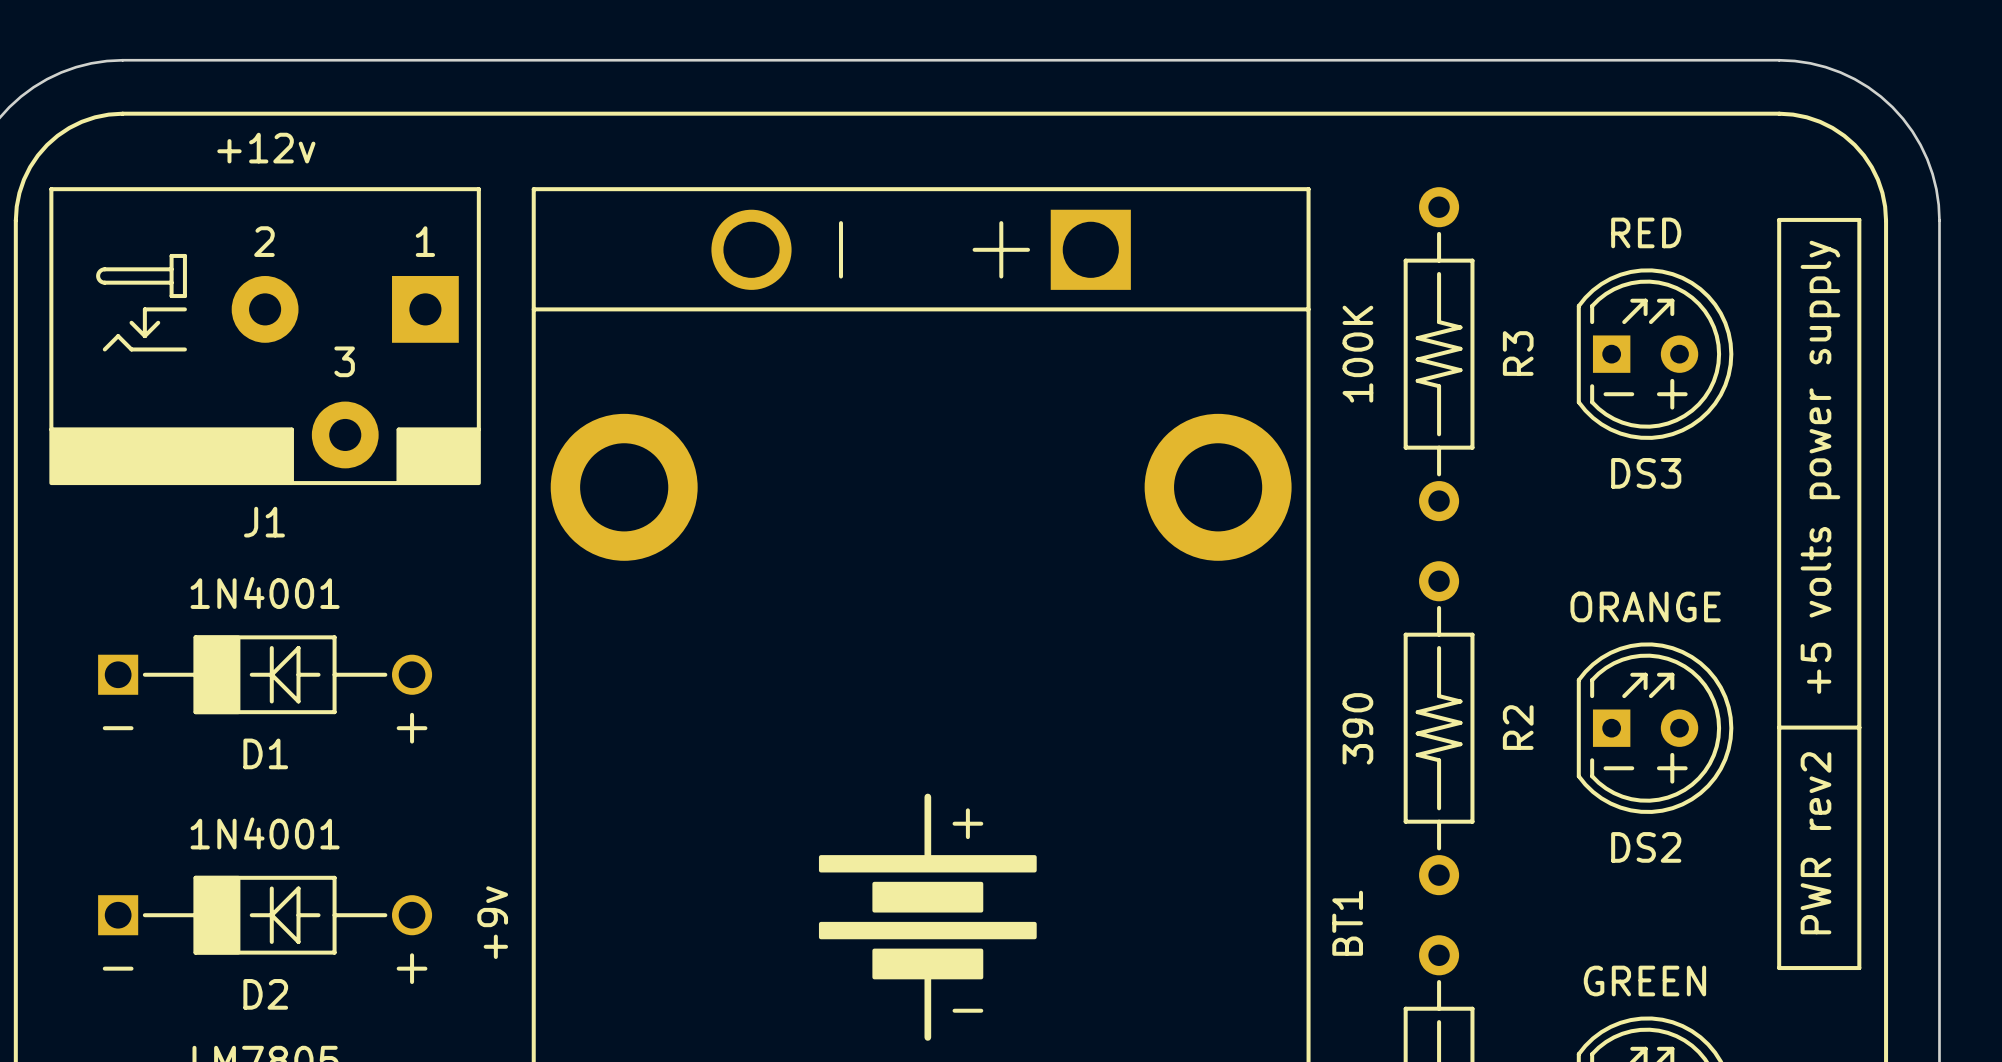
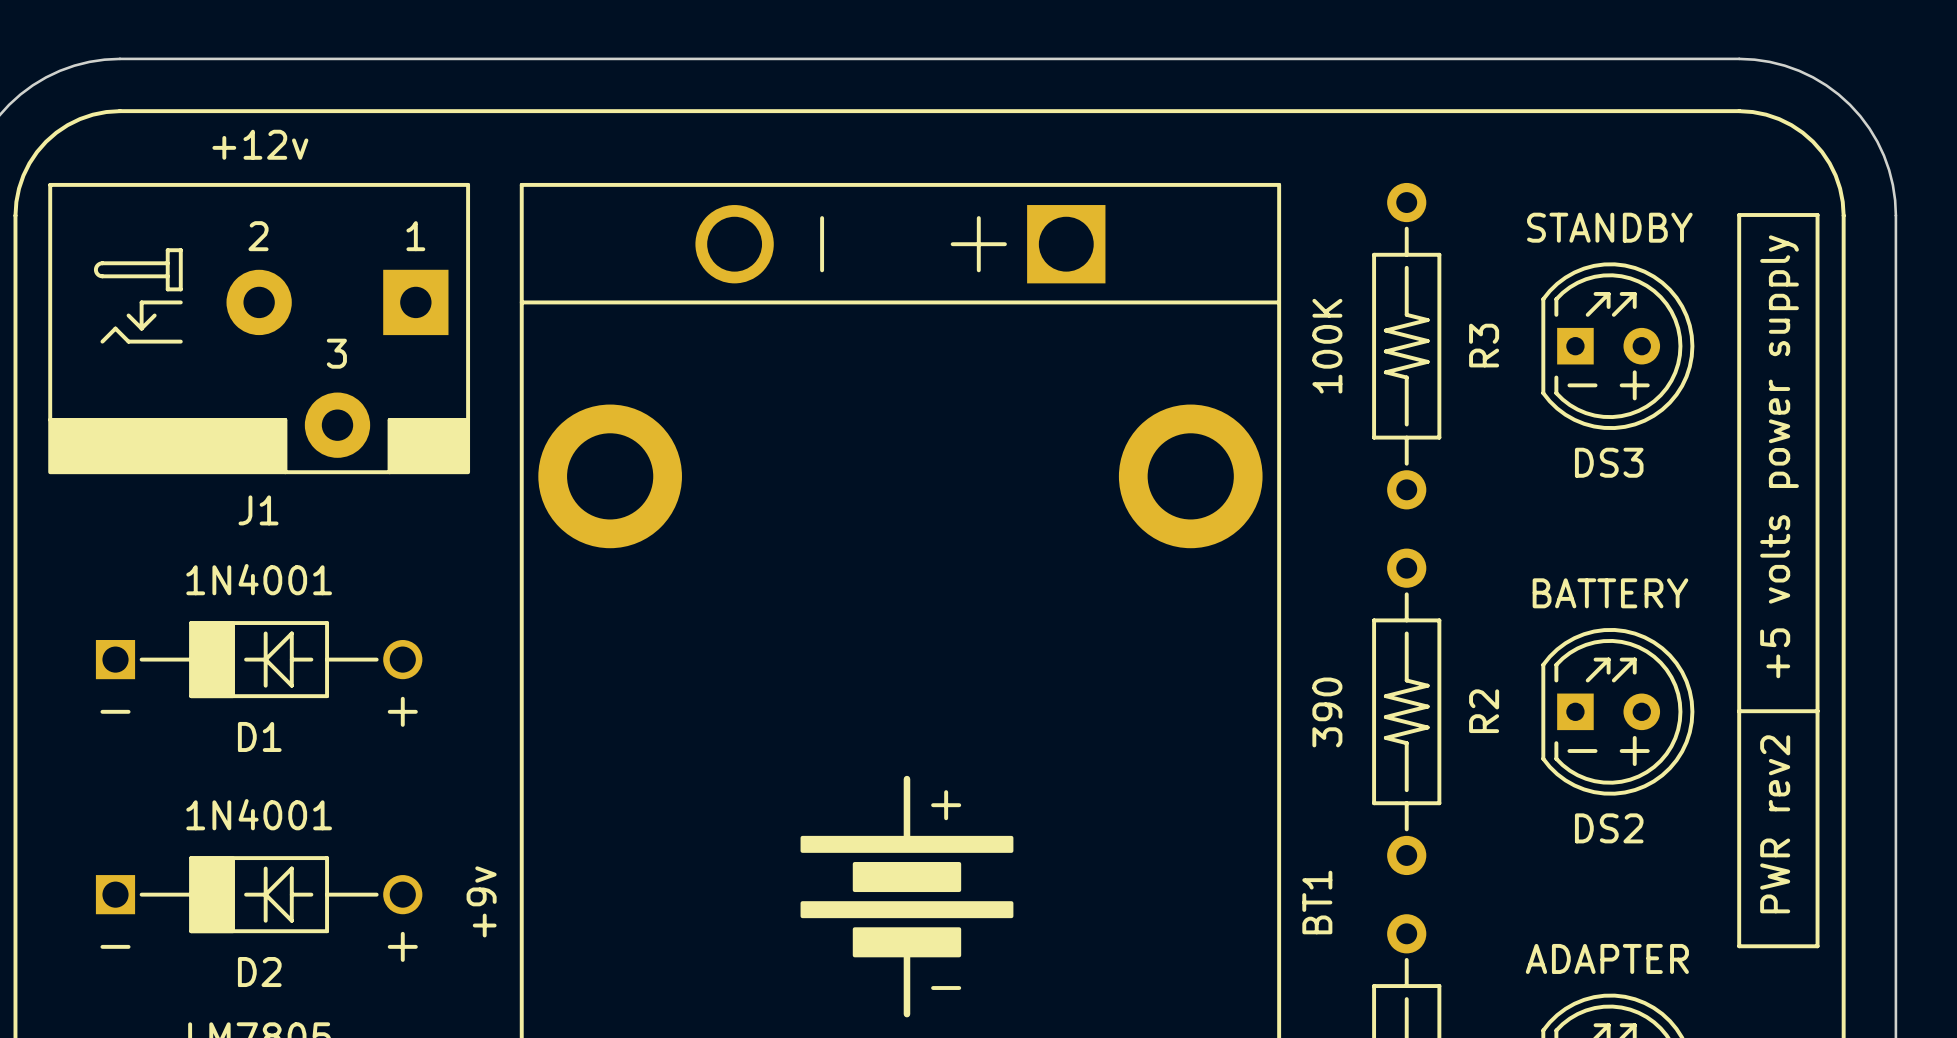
DS3 value: RED (1646, 232) -> STANDBY (1609, 227)
DS2 value: ORANGE (1645, 606) -> BATTERY (1610, 593)
part value: GREEN (1644, 981) -> ADAPTER (1607, 958)

